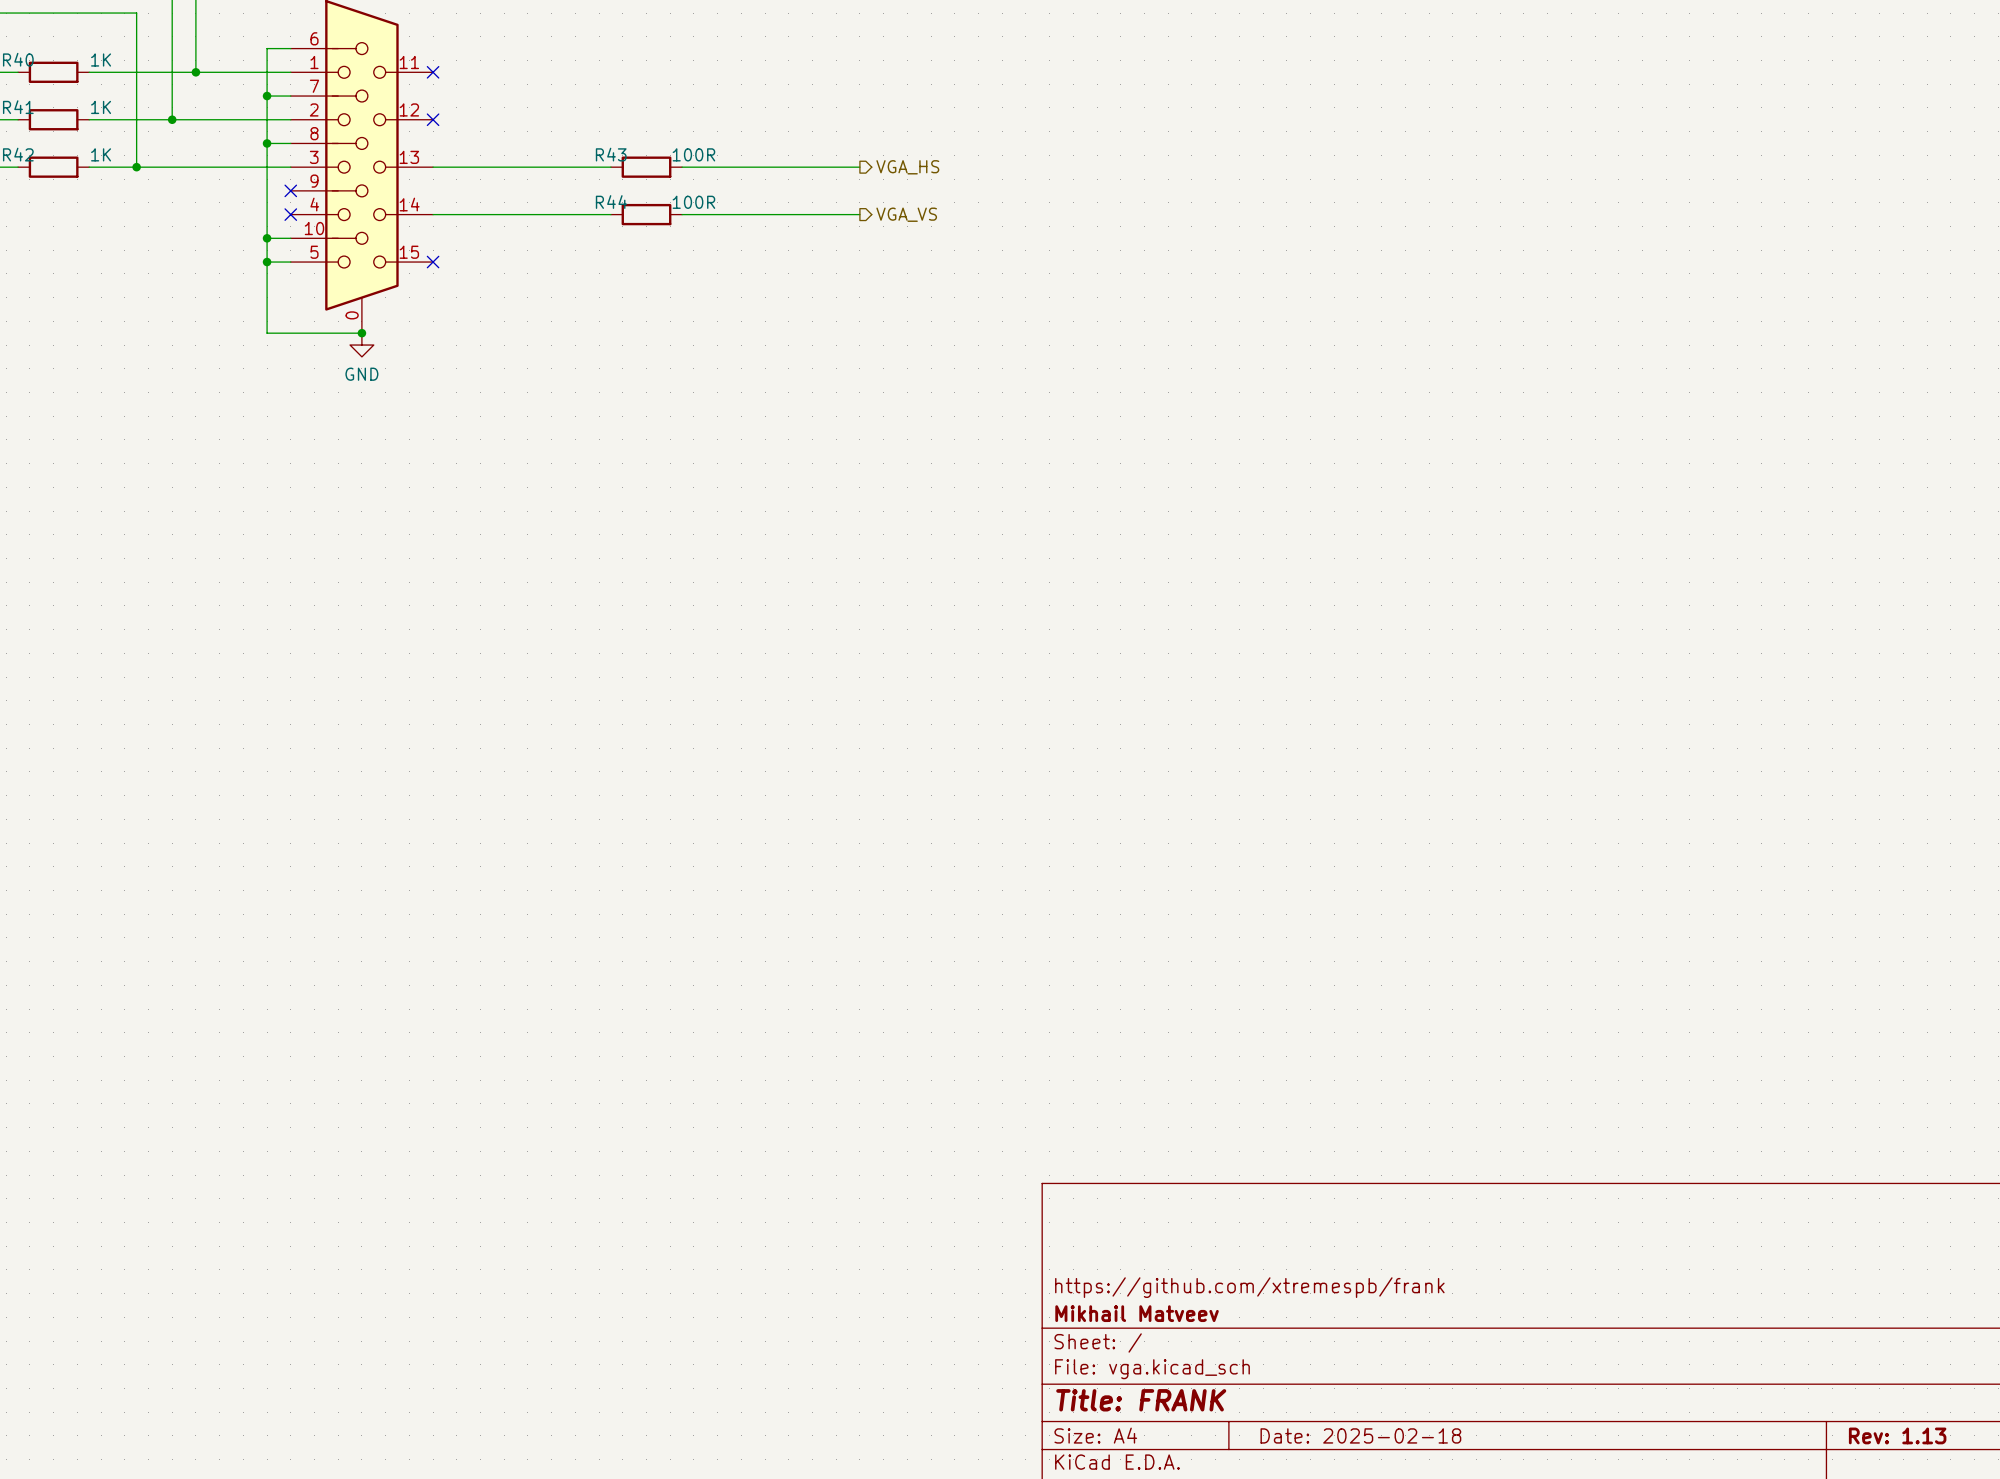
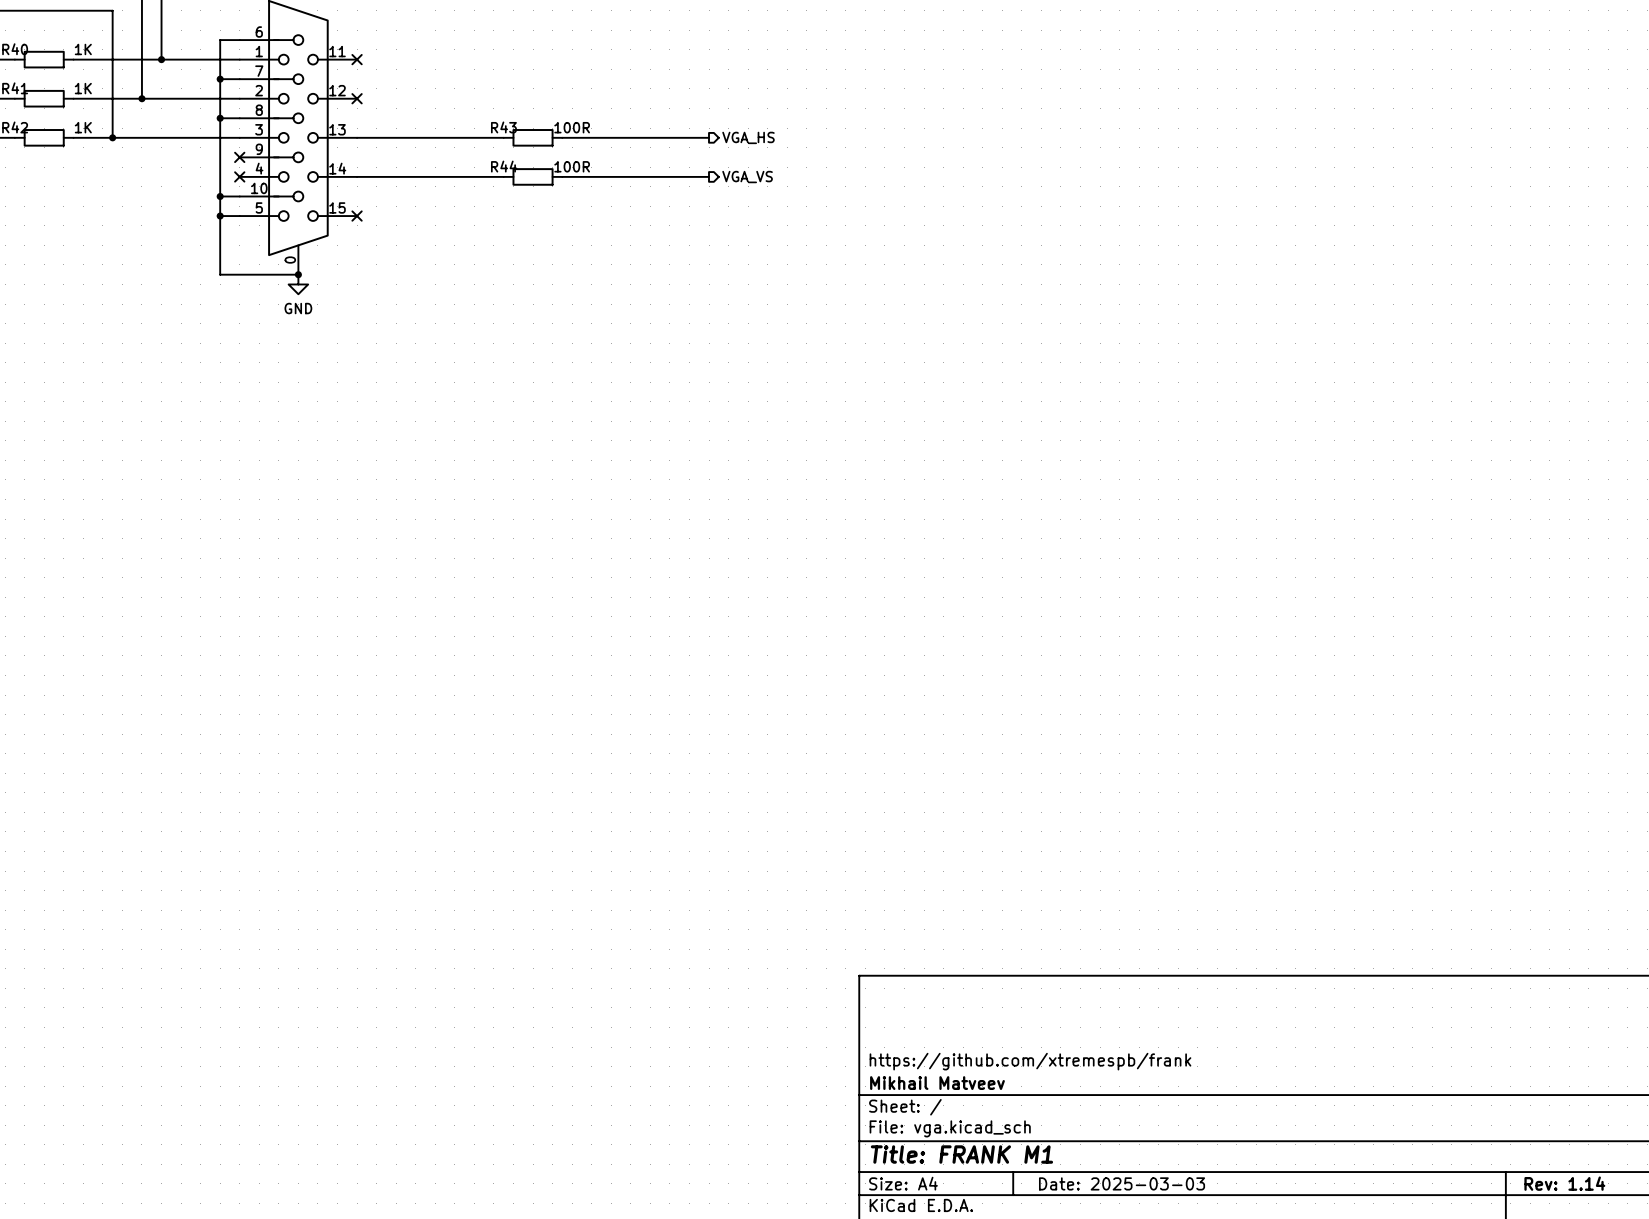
title block: Title: FRANK (1141, 1400) -> Title: FRANK M1 (961, 1154)
title block: Date: 2025-02-18 (1360, 1435) -> Date: 2025-03-03 (1122, 1183)
title block: Rev: 1.13 (1897, 1435) -> Rev: 1.14 (1564, 1183)

